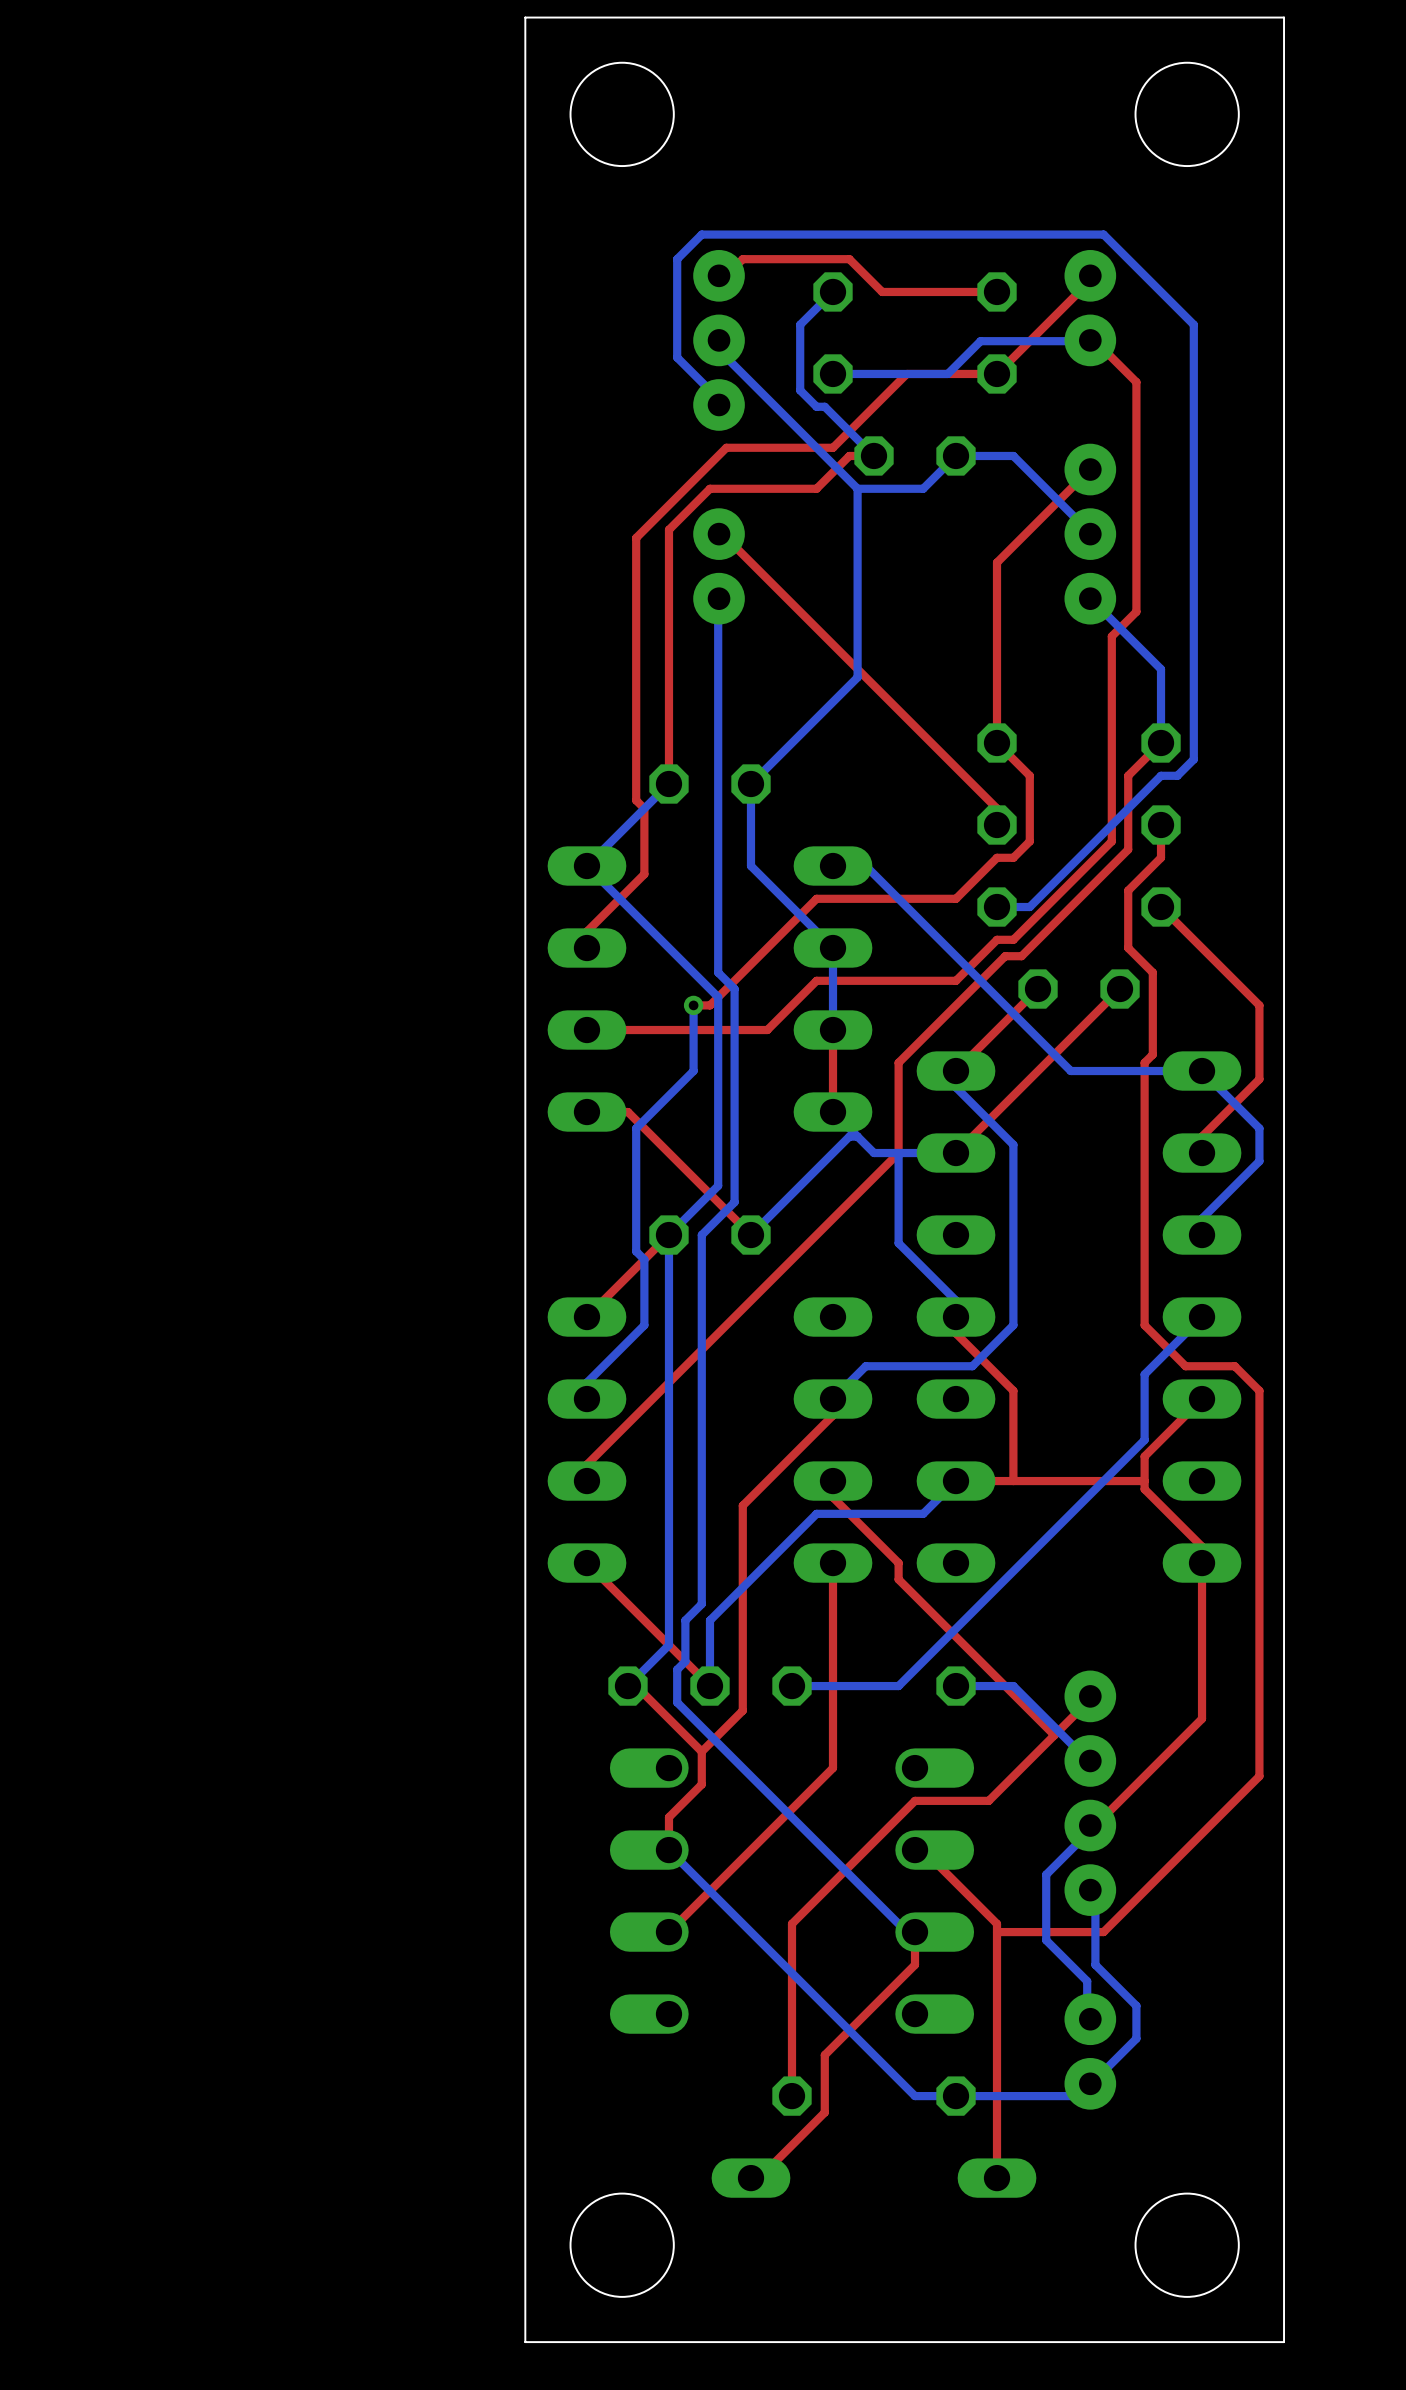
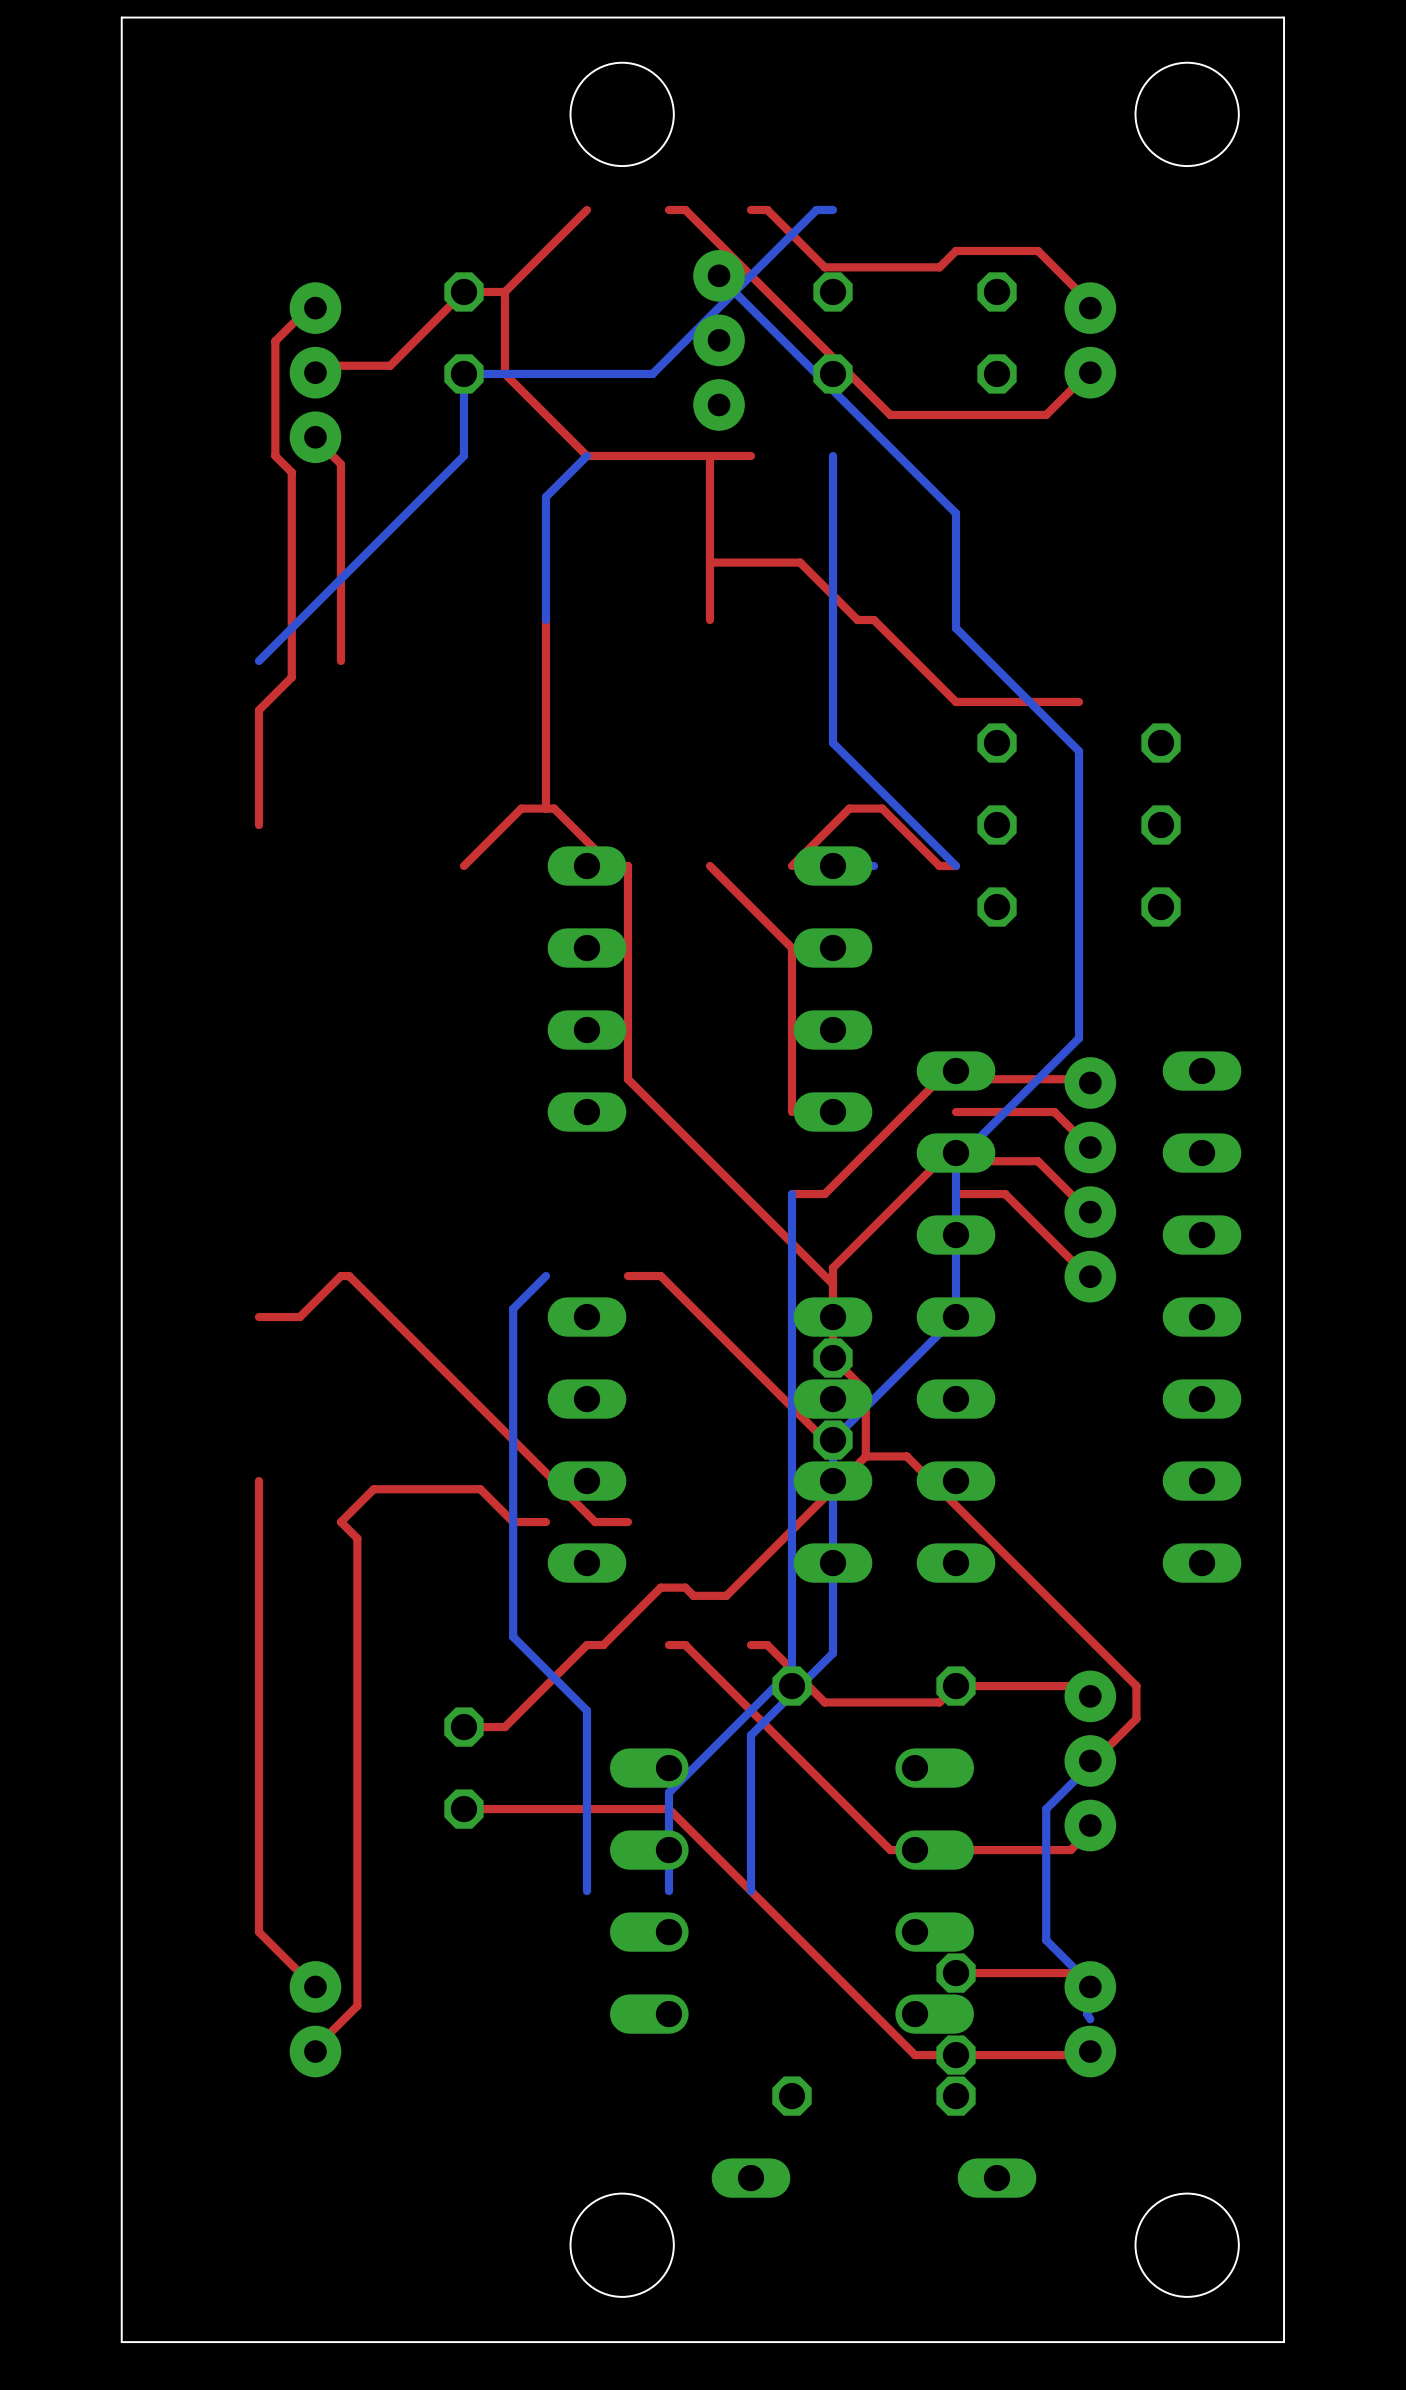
board edge: (525, 17) (525, 2342) -> (525, 17) (121, 17) (121, 2342) (525, 2342)
top track: none -> (586, 209) (504, 291)
top track: none -> (668, 209) (685, 209) (890, 414) (1046, 414) (1090, 372)
top track: none -> (750, 209) (767, 209) (824, 267) (939, 267) (956, 250) (1038, 250) (1087, 300) (1090, 308)
bottom track: none -> (833, 209) (816, 209) (652, 373) (463, 373) (463, 455) (258, 660)
top track: (719, 275) (726, 275) (742, 259) (849, 259) (882, 291) (997, 291) -> none
top track: (1090, 275) (1087, 283) (997, 373) (906, 373) (833, 447) (726, 447) (636, 537) (636, 800) (644, 808) (644, 874) (586, 931) (586, 948) -> none
top track: none -> (504, 291) (463, 291) (390, 365) (316, 365) (315, 372)
top track: none -> (504, 291) (504, 373) (586, 455) (750, 455)
bottom track: (833, 291) (800, 324) (800, 390) (816, 406) (824, 406) (874, 455) -> none
top track: none -> (315, 308) (308, 308) (275, 341) (275, 455) (291, 472) (291, 677) (258, 710) (258, 825)
part position: (1090, 308) -> (1090, 340)
part: none -> (463, 332)
bottom track: (719, 340) (726, 341) (726, 357) (857, 488) -> none
bottom track: (1090, 340) (980, 341) (947, 373) (833, 373) -> none
top track: (1090, 340) (1095, 341) (1136, 382) (1136, 611) (1111, 636) (1111, 841) (1013, 939) (997, 939) (956, 980) (816, 980) (767, 1030) (586, 1030) -> none
bottom track: (719, 404) (718, 398) (677, 357) (677, 259) (701, 234) (1103, 234) (1193, 324) (1193, 759) (1177, 775) (1161, 775) (1029, 907) (997, 907) -> none
top track: none -> (315, 437) (340, 464) (340, 660)
bottom track: none -> (586, 455) (545, 496) (545, 619)
top track: none -> (709, 455) (709, 619)
bottom track: none -> (833, 455) (833, 743) (956, 866)
top track: (874, 455) (849, 455) (816, 488) (709, 488) (668, 529) (668, 784) -> none
part: (915, 455) -> none
top track: (1090, 469) (997, 562) (997, 743) (1029, 775) (1029, 841) (1013, 857) (997, 857) (956, 898) (816, 898) (709, 1005) (693, 1005) -> none
bottom track: (857, 488) (923, 488) (956, 455) (1013, 455) (1090, 534) -> none
bottom track: (857, 488) (857, 677) (750, 784) (750, 866) (833, 948) (833, 1030) -> none
top track: (719, 534) (726, 537) (997, 808) (997, 825) -> none
part position: (1090, 534) -> (315, 372)
top track: none -> (709, 562) (800, 562) (857, 619) (874, 619) (956, 701) (1079, 701)
part: (719, 566) -> none
bottom track: (719, 598) (718, 972) (734, 989) (734, 1202) (701, 1235) (701, 1604) (685, 1620) (685, 1661) (677, 1669) (677, 1702) (906, 1932) (915, 1932) -> none
bottom track: (1090, 598) (1161, 669) (1161, 743) -> none
top track: none -> (545, 619) (545, 808)
top track: (1161, 743) (1128, 775) (1128, 849) (1021, 956) (1005, 956) (898, 1062) (898, 1153) (586, 1464) (586, 1481) -> none
bottom track: (668, 784) (586, 866) (718, 997) (718, 1185) (668, 1235) (668, 1645) (627, 1686) -> none
part: (709, 784) -> none
top track: (1161, 825) (1161, 857) (1128, 890) (1128, 948) (1152, 972) (1152, 1054) (1144, 1062) (1144, 1325) (1185, 1366) (1234, 1366) (1259, 1390) (1259, 1776) (1103, 1932) (997, 1932) -> none
top track: none -> (463, 866) (521, 808) (554, 808) (611, 866) (627, 866) (627, 1079) (833, 1284)
top track: none -> (709, 866) (791, 948) (791, 1112)
bottom track: (865, 866) (1070, 1071) (1202, 1071) (1259, 1128) (1259, 1161) (1202, 1218) (1202, 1235) -> (865, 866) (874, 866)
top track: none -> (956, 866) (939, 866) (882, 808) (849, 808) (791, 866)
top track: (1161, 907) (1259, 1005) (1259, 1079) (1202, 1136) (1202, 1153) -> none
top track: (1038, 989) (956, 1071) -> none
part: (1079, 989) -> none
top track: (1120, 989) (956, 1153) -> none
bottom track: (693, 1005) (693, 1071) (636, 1128) (636, 1251) (644, 1259) (644, 1325) (586, 1382) (586, 1399) -> none
via: (693, 1005) -> none
top track: (833, 1030) (833, 1112) -> none
bottom track: (956, 1071) (956, 1087) (1013, 1144) (1013, 1325) (972, 1366) (865, 1366) (833, 1399) -> none
top track: none -> (1090, 1082) (1087, 1079) (939, 1079) (824, 1194) (791, 1194)
top track: (586, 1112) (627, 1112) (750, 1235) -> none
bottom track: (833, 1112) (874, 1153) (956, 1153) -> none
top track: none -> (956, 1112) (1054, 1112) (1090, 1147)
bottom track: (857, 1136) (849, 1136) (750, 1235) -> none
bottom track: (898, 1153) (898, 1243) (956, 1300) -> (734, 291) (956, 513) (956, 628) (1079, 751) (1079, 1038) (956, 1161) (956, 1300)
part: none -> (1090, 1179)
bottom track: none -> (791, 1194) (791, 1669) (668, 1792) (668, 1891)
top track: none -> (956, 1194) (1005, 1194) (1087, 1276) (1090, 1276)
top track: none -> (1090, 1212) (1038, 1161) (939, 1161) (833, 1267) (833, 1358) (865, 1390) (865, 1456)
top track: (668, 1235) (586, 1317) -> none
part: (709, 1235) -> none
bottom track: none -> (545, 1276) (513, 1308) (513, 1636) (586, 1710) (586, 1891)
top track: none -> (627, 1276) (660, 1276) (824, 1440) (833, 1440)
top track: none -> (258, 1317) (299, 1317) (340, 1276) (349, 1276) (595, 1522) (627, 1522)
bottom track: none -> (956, 1317) (833, 1440) (833, 1653) (750, 1735) (750, 1891)
top track: (956, 1317) (956, 1333) (1013, 1390) (1013, 1481) -> none
bottom track: (1202, 1317) (1144, 1374) (1144, 1440) (898, 1686) (791, 1686) -> none
top track: (833, 1399) (833, 1415) (742, 1505) (742, 1710) (701, 1751) -> none
part: none -> (833, 1399)
top track: (1202, 1399) (1144, 1456) (1144, 1489) (1202, 1546) (1202, 1718) (1095, 1825) (1090, 1825) -> none
top track: none -> (865, 1456) (726, 1595) (693, 1595) (685, 1587) (660, 1587) (603, 1645) (586, 1645) (504, 1727) (463, 1727)
top track: none -> (865, 1456) (906, 1456) (1136, 1686) (1136, 1718) (1095, 1759) (1090, 1760)
top track: none -> (258, 1481) (258, 1932) (315, 1986)
top track: (833, 1481) (833, 1497) (898, 1563) (898, 1579) (1054, 1735) -> none
bottom track: (956, 1481) (923, 1513) (816, 1513) (709, 1620) (709, 1686) -> none
top track: (1144, 1481) (956, 1481) -> none
top track: none -> (545, 1522) (513, 1522) (480, 1489) (373, 1489) (340, 1522) (357, 1538) (357, 2005) (316, 2046) (315, 2051)
top track: (586, 1563) (709, 1686) -> none
top track: (833, 1563) (833, 1768) (668, 1932) -> none
top track: none -> (668, 1645) (685, 1645) (890, 1850) (915, 1850)
part footprint: [1064, 1670, 1117, 1916] -> [1064, 1670, 1117, 1852]
top track: (627, 1686) (636, 1686) (701, 1751) -> none
part: (668, 1686) -> none
bottom track: (956, 1686) (1013, 1686) (1090, 1760) -> none
top track: (1090, 1696) (1087, 1702) (988, 1800) (915, 1800) (791, 1923) (791, 2096) -> (1090, 1696) (1079, 1686) (956, 1686) (939, 1702) (824, 1702) (767, 1645) (750, 1645)
top track: (701, 1751) (701, 1784) (668, 1817) (668, 1850) -> none
part: none -> (463, 1768)
top track: none -> (463, 1809) (668, 1809) (915, 2055) (1087, 2055) (1090, 2051)
bottom track: (1090, 1825) (1087, 1833) (1046, 1874) -> (1090, 1760) (1087, 1768) (1046, 1809) (1046, 1874)
bottom track: (668, 1850) (915, 2096) (1079, 2096) (1136, 2038) (1136, 2005) (1095, 1964) (1095, 1891) (1090, 1890) -> none
top track: (923, 1850) (997, 1923) (997, 2178) -> (923, 1850) (1070, 1850) (1087, 1833) (1090, 1825)
top track: (915, 1932) (915, 1964) (824, 2055) (824, 2112) (759, 2178) (750, 2178) -> none
top track: none -> (956, 1973) (1079, 1973) (1090, 1986)
part: none -> (956, 2014)
part: none -> (315, 2019)
part position: (1090, 2051) -> (1090, 2019)

